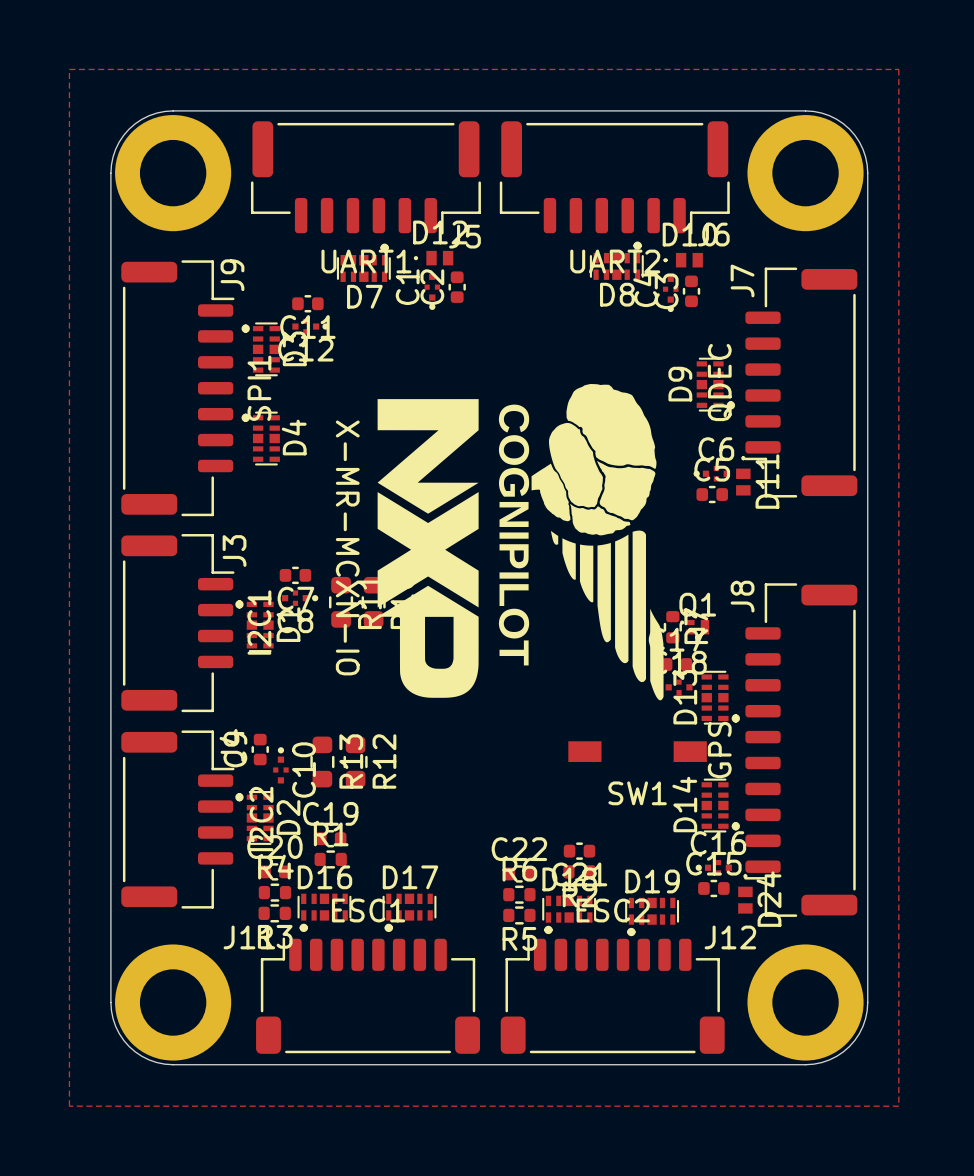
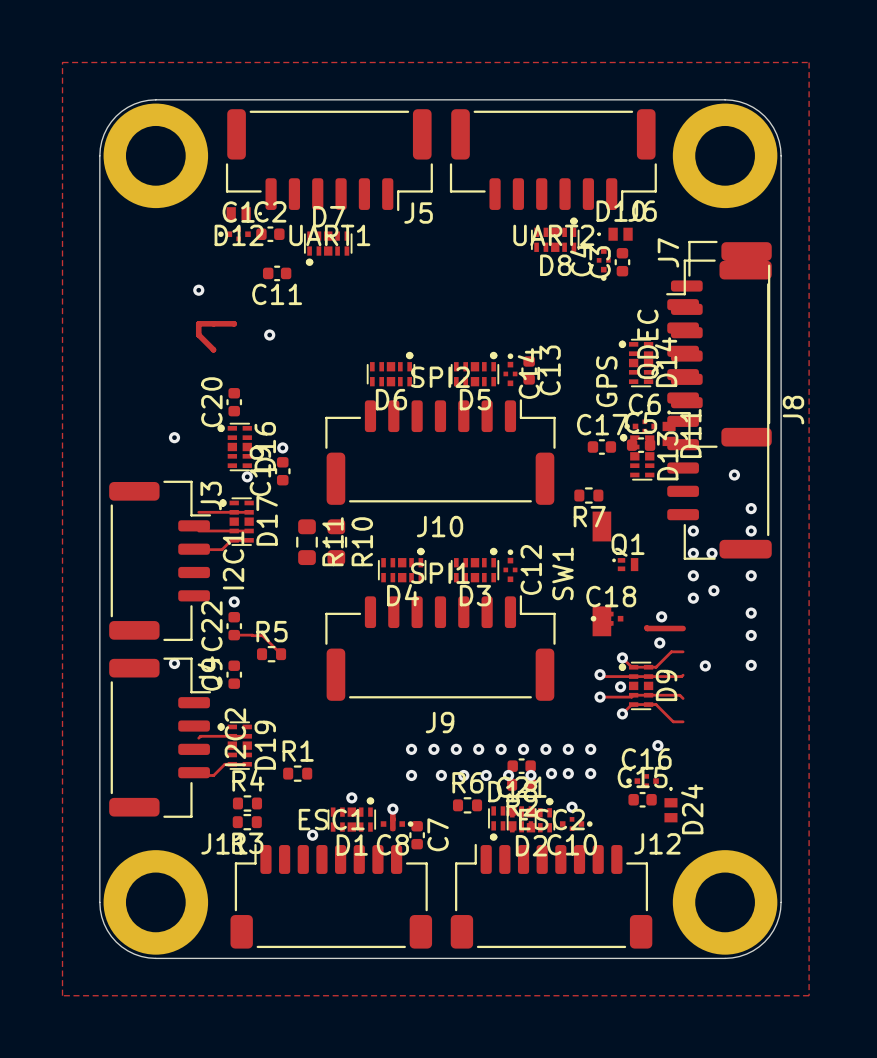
D12 rotation: 0° (433, 258) -> 180° (244, 213)
D12 position: (433, 258) -> (244, 213)
J9 footprint: [121, 260, 235, 517] -> [325, 595, 556, 701]
D7 rotation: 0° (363, 262) -> 180° (328, 248)
J9 name position: J9 (232, 275) -> J9 (440, 722)
C2 rotation: 0° (457, 287) -> 90° clockwise (270, 234)
C2 position: (457, 287) -> (270, 234)
C1 rotation: 0° (432, 291) -> 90° clockwise (234, 234)
C1 position: (432, 291) -> (234, 234)
via: none -> (198, 290)
C12 rotation: 0° (310, 326) -> 90° counterclockwise (510, 565)
C12 position: (310, 326) -> (510, 565)
D3 rotation: 0° (260, 349) -> 90° clockwise (474, 565)
D3 position: (260, 349) -> (474, 565)
track: none -> (234, 323) (198, 323) (198, 335) (213, 349)
via: none -> (269, 335)
drawing: [377, 383, 664, 701] -> none
D9 rotation: 0° (715, 384) -> 180° (635, 685)
D9 position: (715, 384) -> (635, 685)
J9 value position: SPI1 (259, 388) -> SPI1 (440, 573)
D6: none -> (391, 369)
D5: none -> (474, 369)
C14: none -> (510, 369)
C13: none -> (529, 370)
D4 rotation: 0° (260, 438) -> 90° clockwise (402, 565)
D4 position: (260, 438) -> (402, 565)
via: none -> (174, 437)
via: none -> (282, 447)
J10: none -> SPI2 (440, 452)
via: none -> (734, 474)
via: none -> (247, 476)
text: X-MR-MCXN-IO (347, 547) -> none
via: none -> (751, 508)
track: none -> (198, 512) (249, 512)
C7 rotation: 0° (295, 575) -> 90° clockwise (417, 835)
C7 position: (295, 575) -> (417, 835)
J8 footprint: [744, 583, 858, 917] -> [666, 259, 772, 560]
track: none -> (198, 530) (249, 530)
via: none -> (693, 530)
via: none -> (751, 530)
J8 name position: J8 (742, 596) -> J8 (793, 410)
C8 position: (300, 598) -> (397, 824)
track: none -> (249, 540) (231, 540) (222, 549) (198, 549)
via: none -> (693, 553)
via: none -> (712, 553)
D1 rotation: 0° (254, 625) -> 90° clockwise (351, 814)
D1 position: (254, 625) -> (351, 814)
R7 rotation: 0° (672, 627) -> 90° clockwise (588, 495)
R7 position: (672, 627) -> (588, 495)
via: none -> (693, 575)
via: none -> (751, 575)
via: none -> (713, 590)
C17 position: (676, 664) -> (601, 446)
via: none -> (693, 598)
via: none -> (234, 601)
via: none -> (751, 613)
via: none -> (661, 616)
track: none -> (646, 627) (683, 628)
D13 rotation: 0° (720, 697) -> 180° (637, 456)
D13 position: (720, 697) -> (637, 456)
track: none -> (234, 635) (262, 635) (281, 654)
via: none -> (751, 635)
via: none -> (659, 642)
track: none -> (683, 651) (671, 651) (656, 667) (631, 667) (622, 657)
via: none -> (622, 657)
via: none -> (174, 663)
via: none -> (705, 665)
via: none -> (751, 665)
track: none -> (600, 674) (600, 676) (683, 675)
via: none -> (600, 674)
J8 value position: GPS (719, 750) -> GPS (606, 381)
SW1 rotation: 0° (637, 751) -> 90° clockwise (601, 573)
SW1 position: (637, 751) -> (601, 573)
R13: (322, 761) -> none
R12: (355, 761) -> none
via: none -> (620, 686)
C10 rotation: 0° (280, 765) -> 90° clockwise (576, 824)
C10 position: (280, 765) -> (576, 824)
track: none -> (600, 697) (679, 695) (683, 698)
via: none -> (600, 697)
track: none -> (622, 713) (631, 704) (656, 704) (673, 721) (683, 721)
via: none -> (622, 713)
D14 rotation: 0° (720, 805) -> 180° (635, 363)
D14 position: (720, 805) -> (635, 363)
D2 rotation: 0° (254, 817) -> 90° clockwise (530, 815)
D2 position: (254, 817) -> (530, 815)
track: none -> (247, 736) (200, 736) (198, 738)
via: none -> (657, 745)
via: none -> (411, 749)
via: none -> (433, 749)
via: none -> (456, 749)
via: none -> (478, 749)
via: none -> (501, 749)
via: none -> (523, 749)
via: none -> (545, 749)
via: none -> (568, 749)
via: none -> (590, 749)
C19 rotation: 0° (330, 838) -> 90° clockwise (282, 471)
C19 position: (330, 838) -> (282, 471)
track: none -> (247, 764) (224, 764) (213, 775) (198, 775)
via: none -> (551, 773)
via: none -> (568, 773)
via: none -> (590, 773)
via: none -> (411, 775)
via: none -> (441, 775)
via: none -> (463, 775)
via: none -> (486, 775)
via: none -> (508, 775)
via: none -> (530, 775)
C20 rotation: 0° (274, 871) -> 90° clockwise (234, 402)
C20 position: (274, 871) -> (234, 402)
C22 rotation: 0° (519, 873) -> 90° clockwise (234, 626)
C22 position: (519, 873) -> (234, 626)
via: none -> (351, 797)
via: none -> (572, 807)
track: none -> (392, 809) (392, 828)
via: none -> (392, 809)
D16 rotation: 0° (324, 912) -> 90° clockwise (234, 446)
D16 position: (324, 912) -> (234, 446)
D17 rotation: 0° (409, 912) -> 90° clockwise (236, 521)
D17 position: (409, 912) -> (236, 521)
R5 position: (519, 915) -> (271, 654)
D19 rotation: 0° (652, 916) -> 90° clockwise (234, 745)
D19 position: (652, 916) -> (234, 745)
via: none -> (312, 835)
R5 name position: R5 (519, 938) -> R5 (271, 631)

